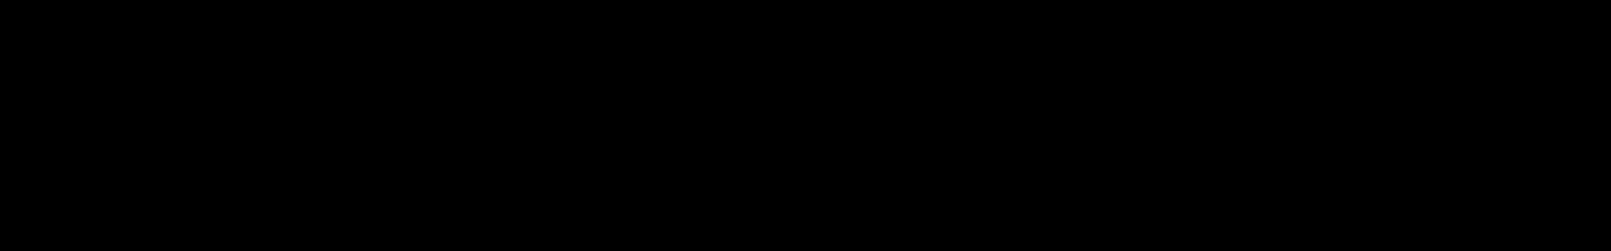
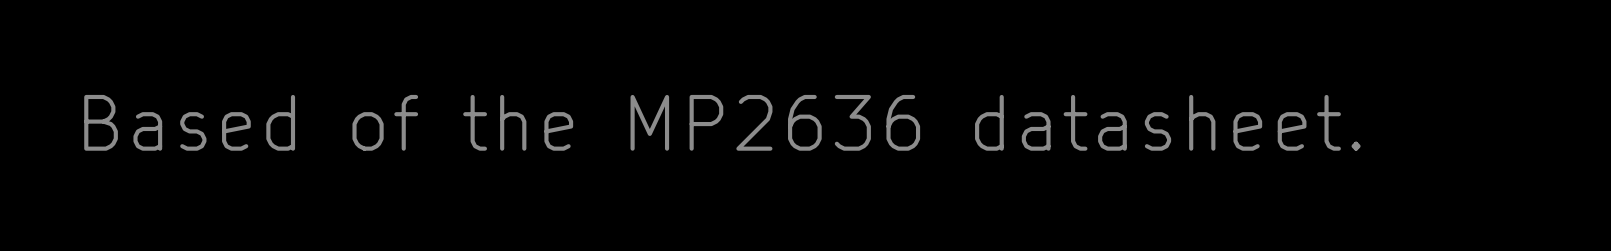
text: none -> Based of the MP2636 datasheet. (722, 122)

